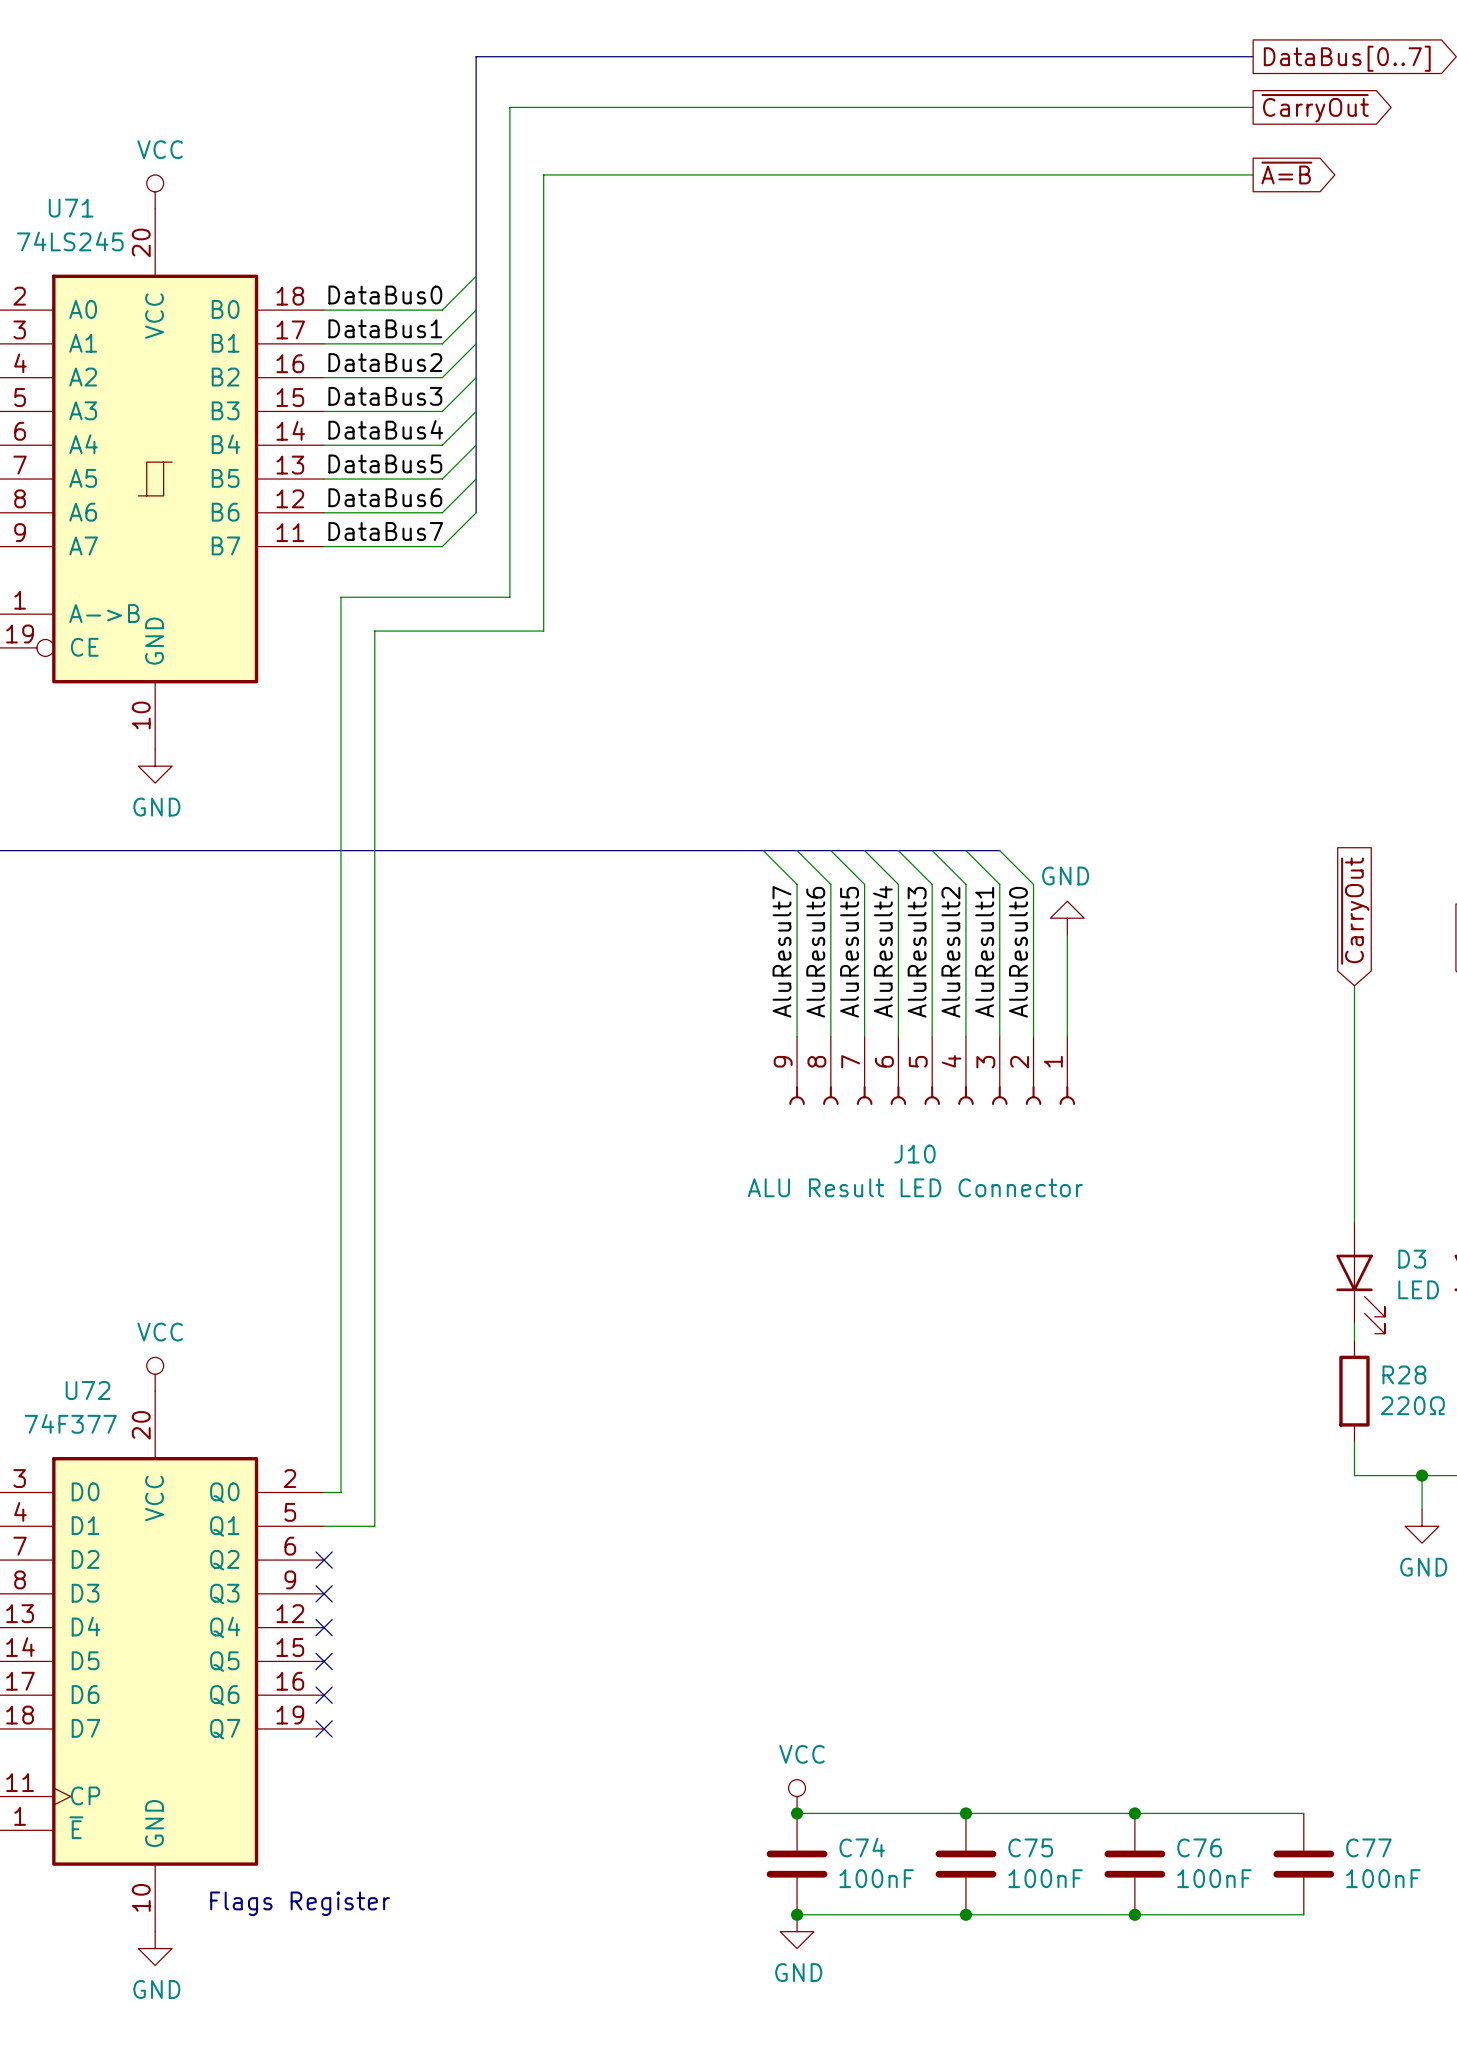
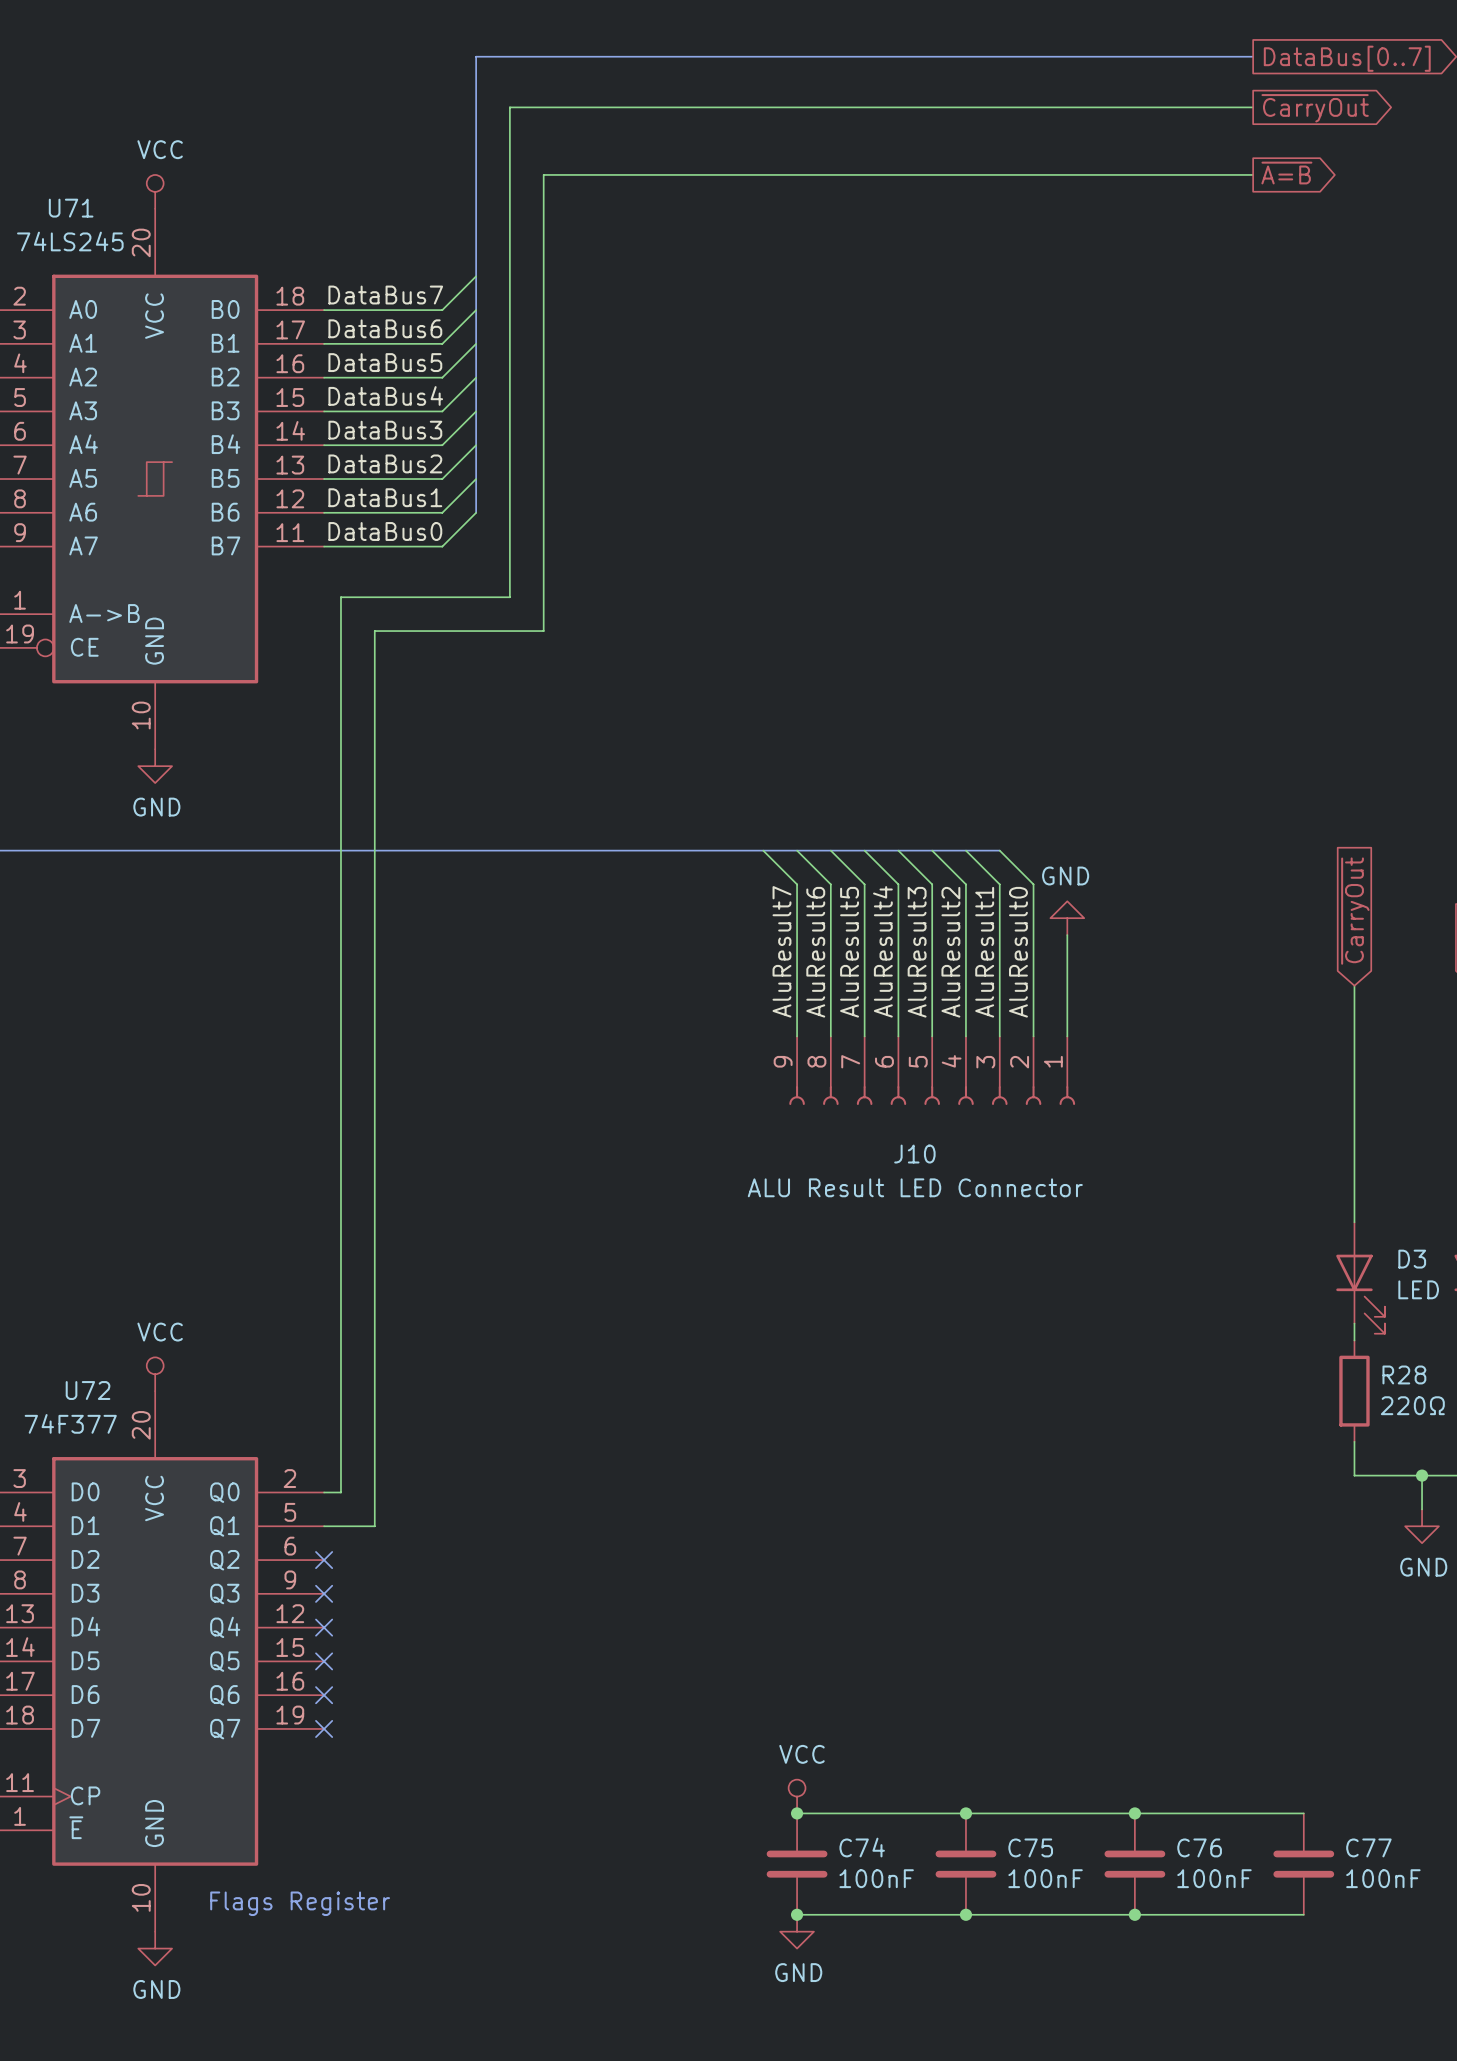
label: DataBus0 (385, 295) -> DataBus7 (385, 295)
label: DataBus1 (385, 328) -> DataBus6 (385, 328)
label: DataBus2 (385, 362) -> DataBus5 (385, 362)
label: DataBus3 (385, 396) -> DataBus4 (385, 395)
label: DataBus4 (385, 429) -> DataBus3 (385, 430)
label: DataBus5 (385, 463) -> DataBus2 (385, 463)
label: DataBus6 (385, 497) -> DataBus1 (385, 497)
label: DataBus7 (385, 531) -> DataBus0 (385, 531)

